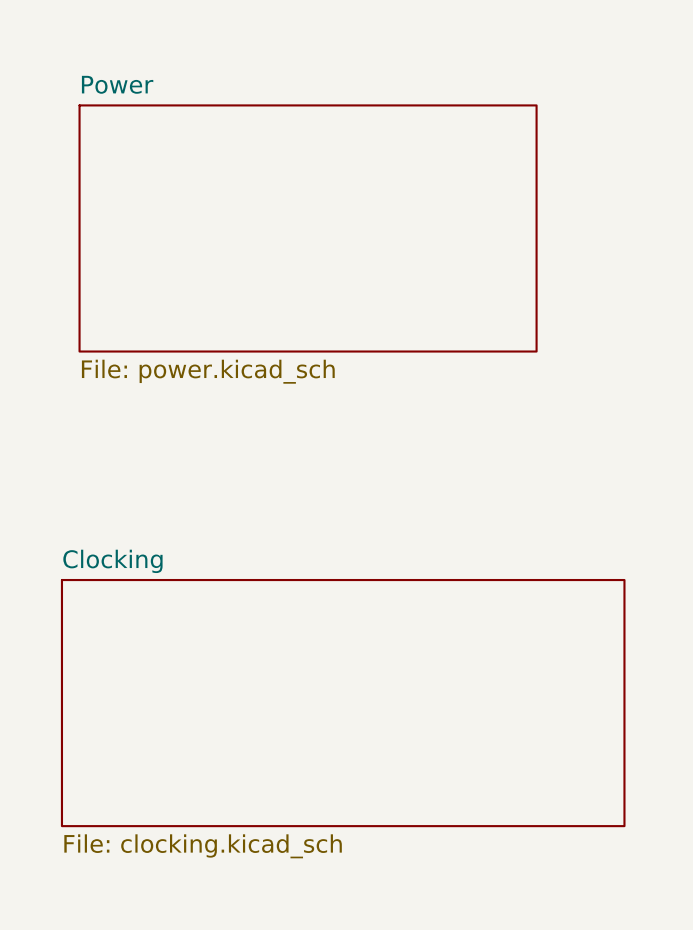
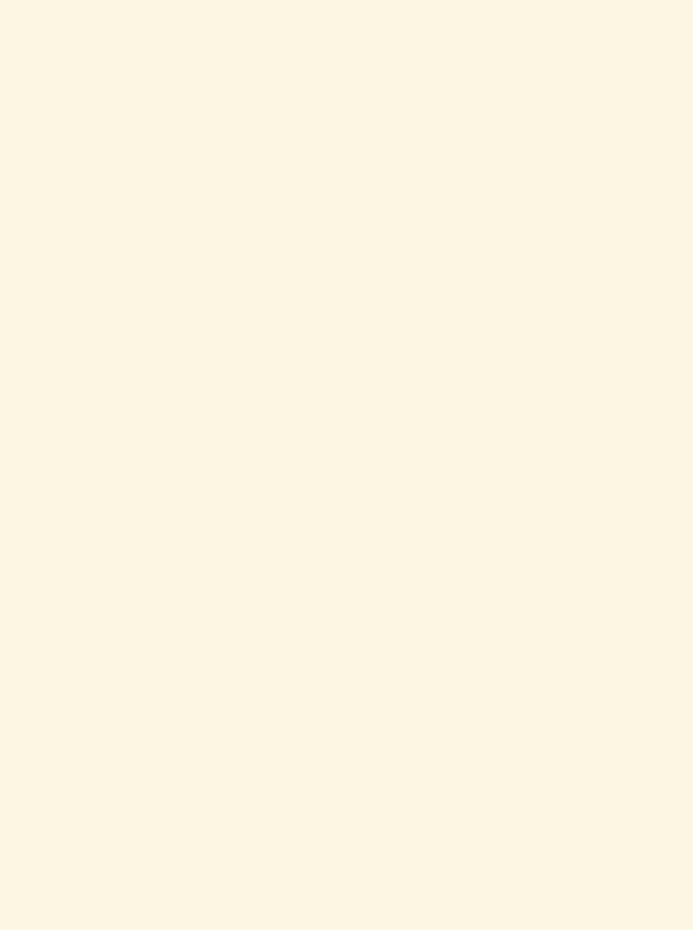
sheet Power: File: power.kicad_sch (308, 228) -> none
sheet Clocking: File: clocking.kicad_sch (343, 703) -> none

